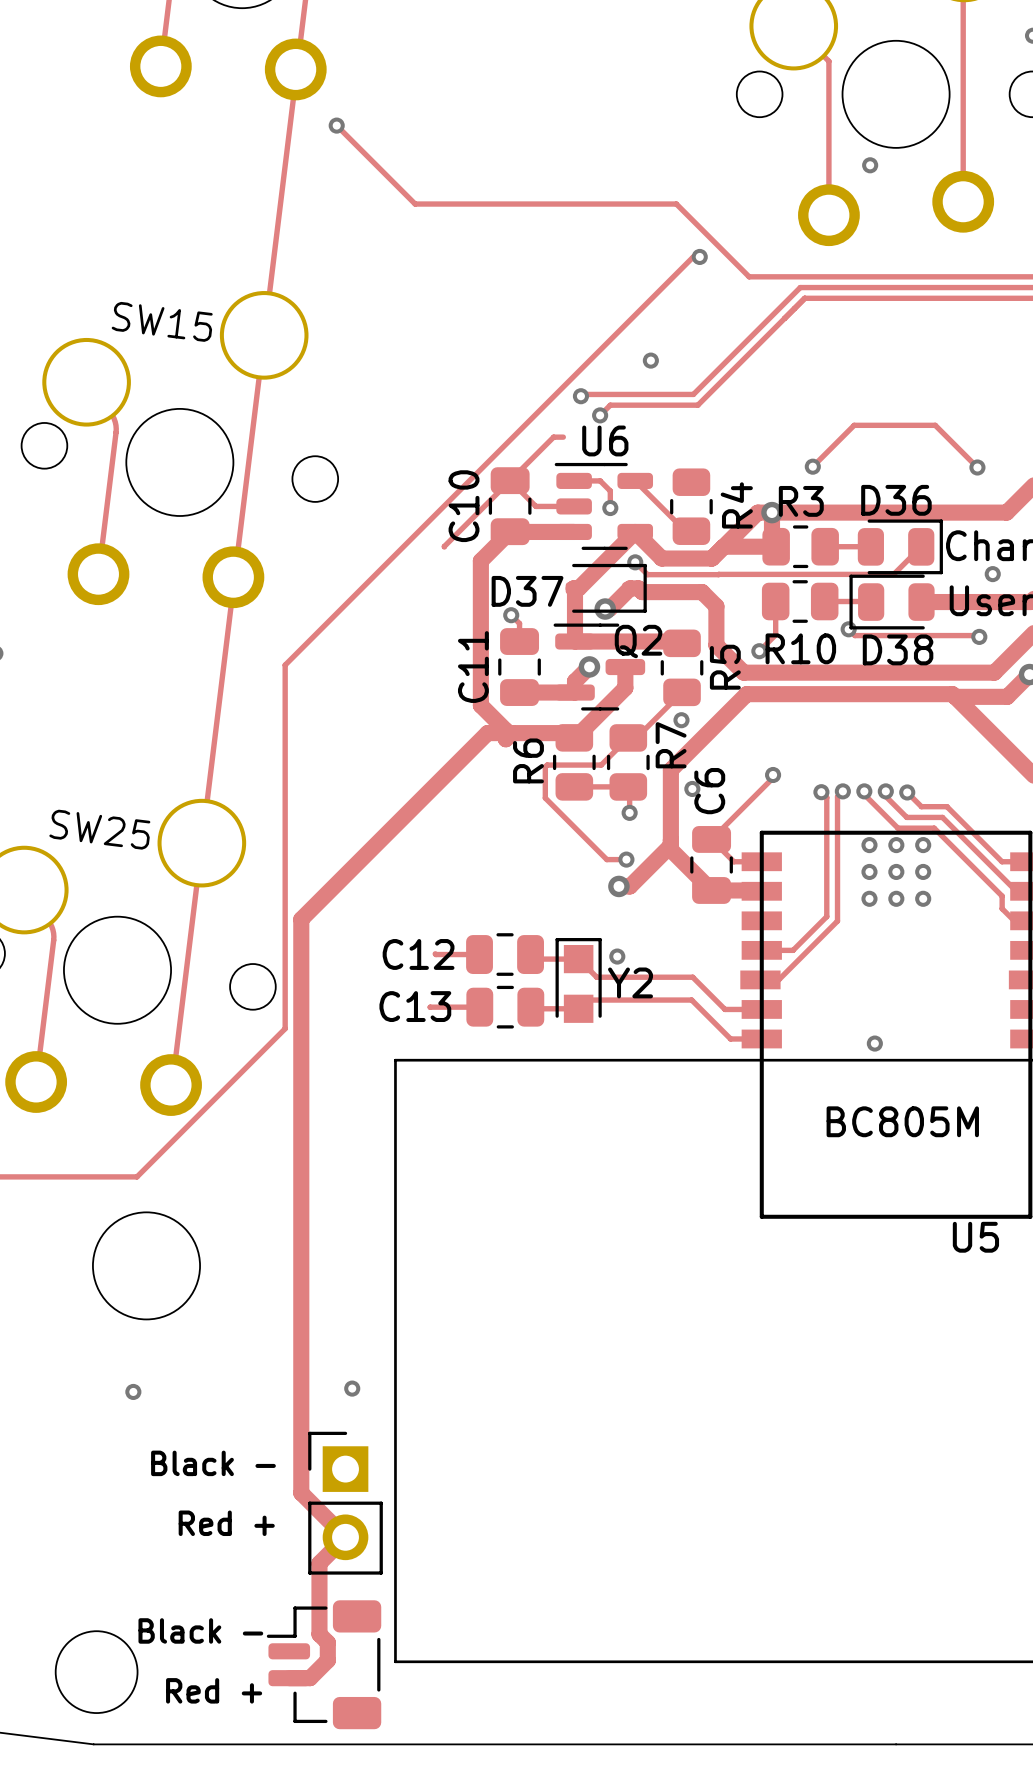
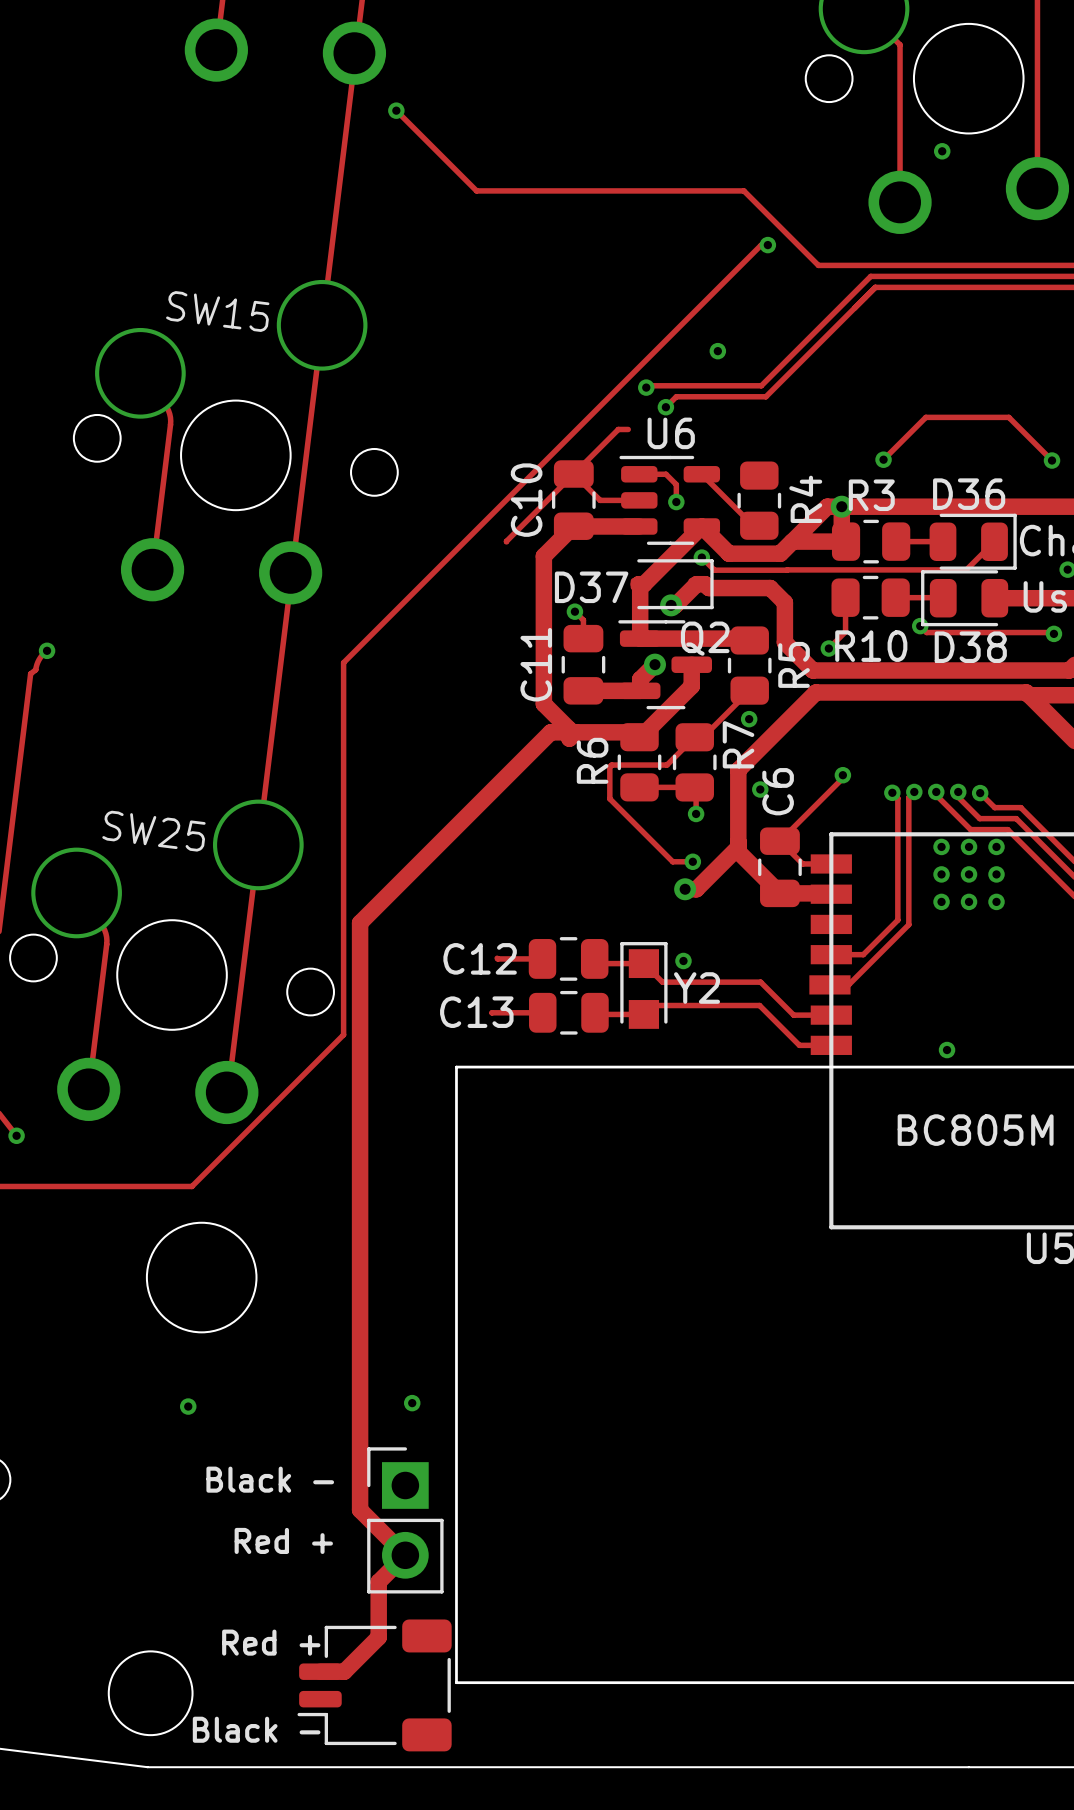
part footprint: [266, 1600, 382, 1730] -> [297, 1619, 452, 1752]
track: (319, 1617) (319, 1634) (327, 1642) (327, 1660) (310, 1678) (289, 1678) -> (378, 1637) (344, 1671) (320, 1671)
text: Black - (200, 1630) -> Red + (271, 1642)
text: Red + (214, 1690) -> Black - (256, 1729)

